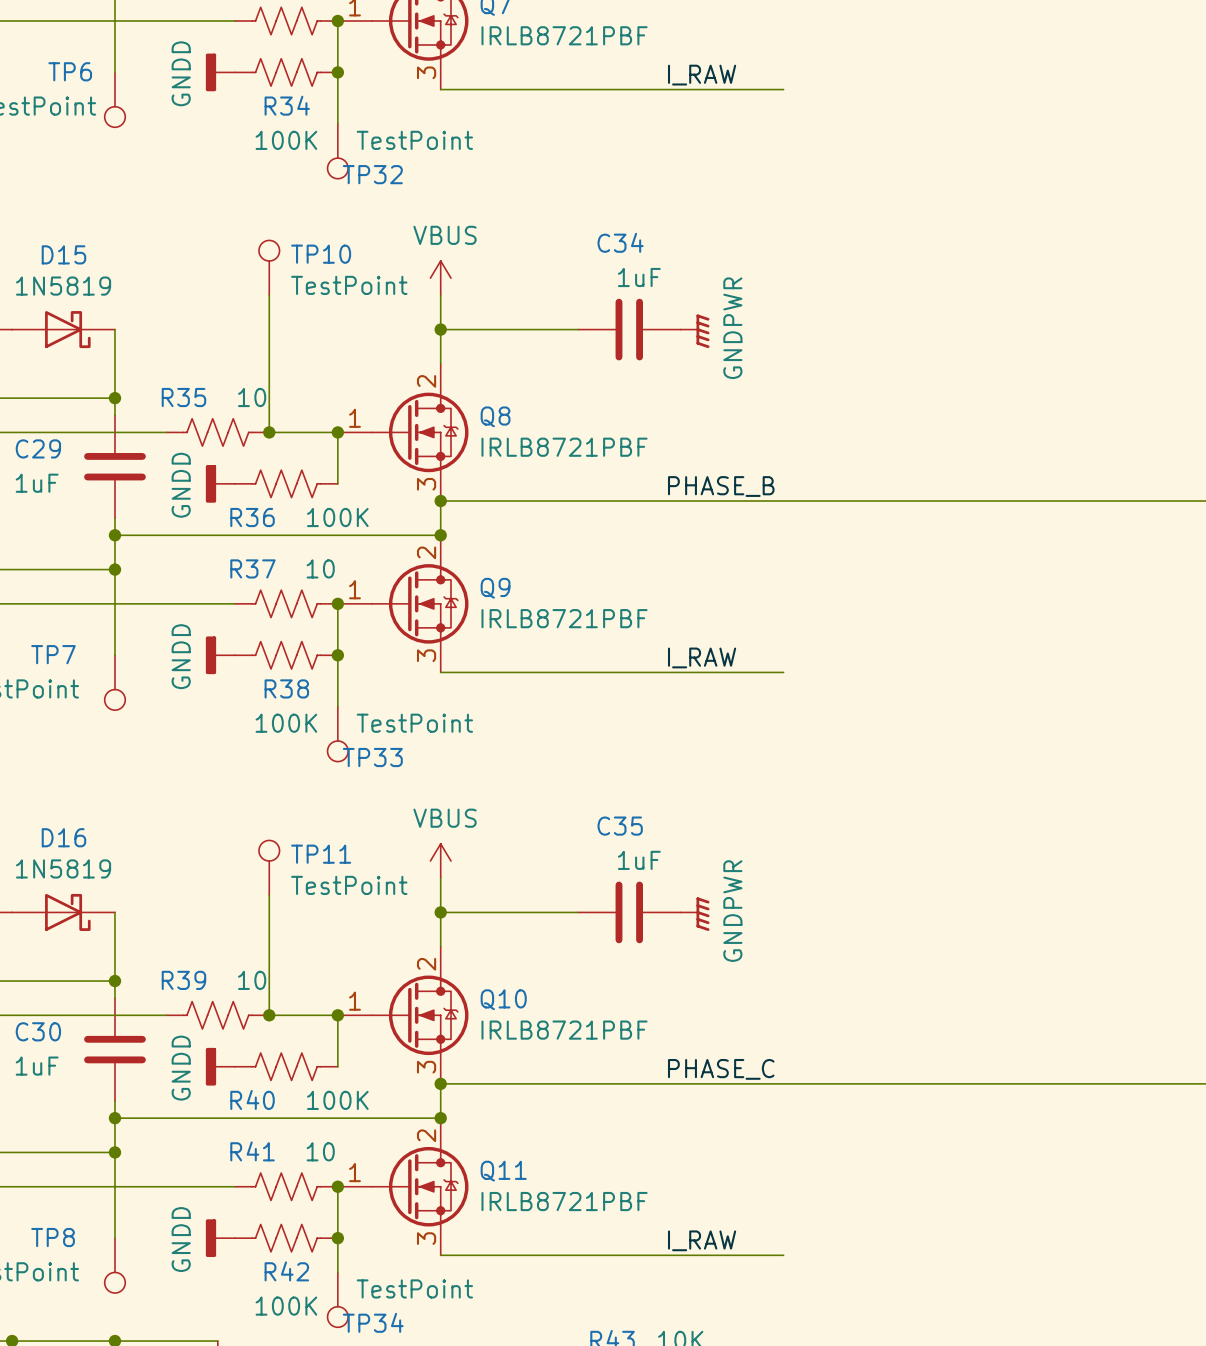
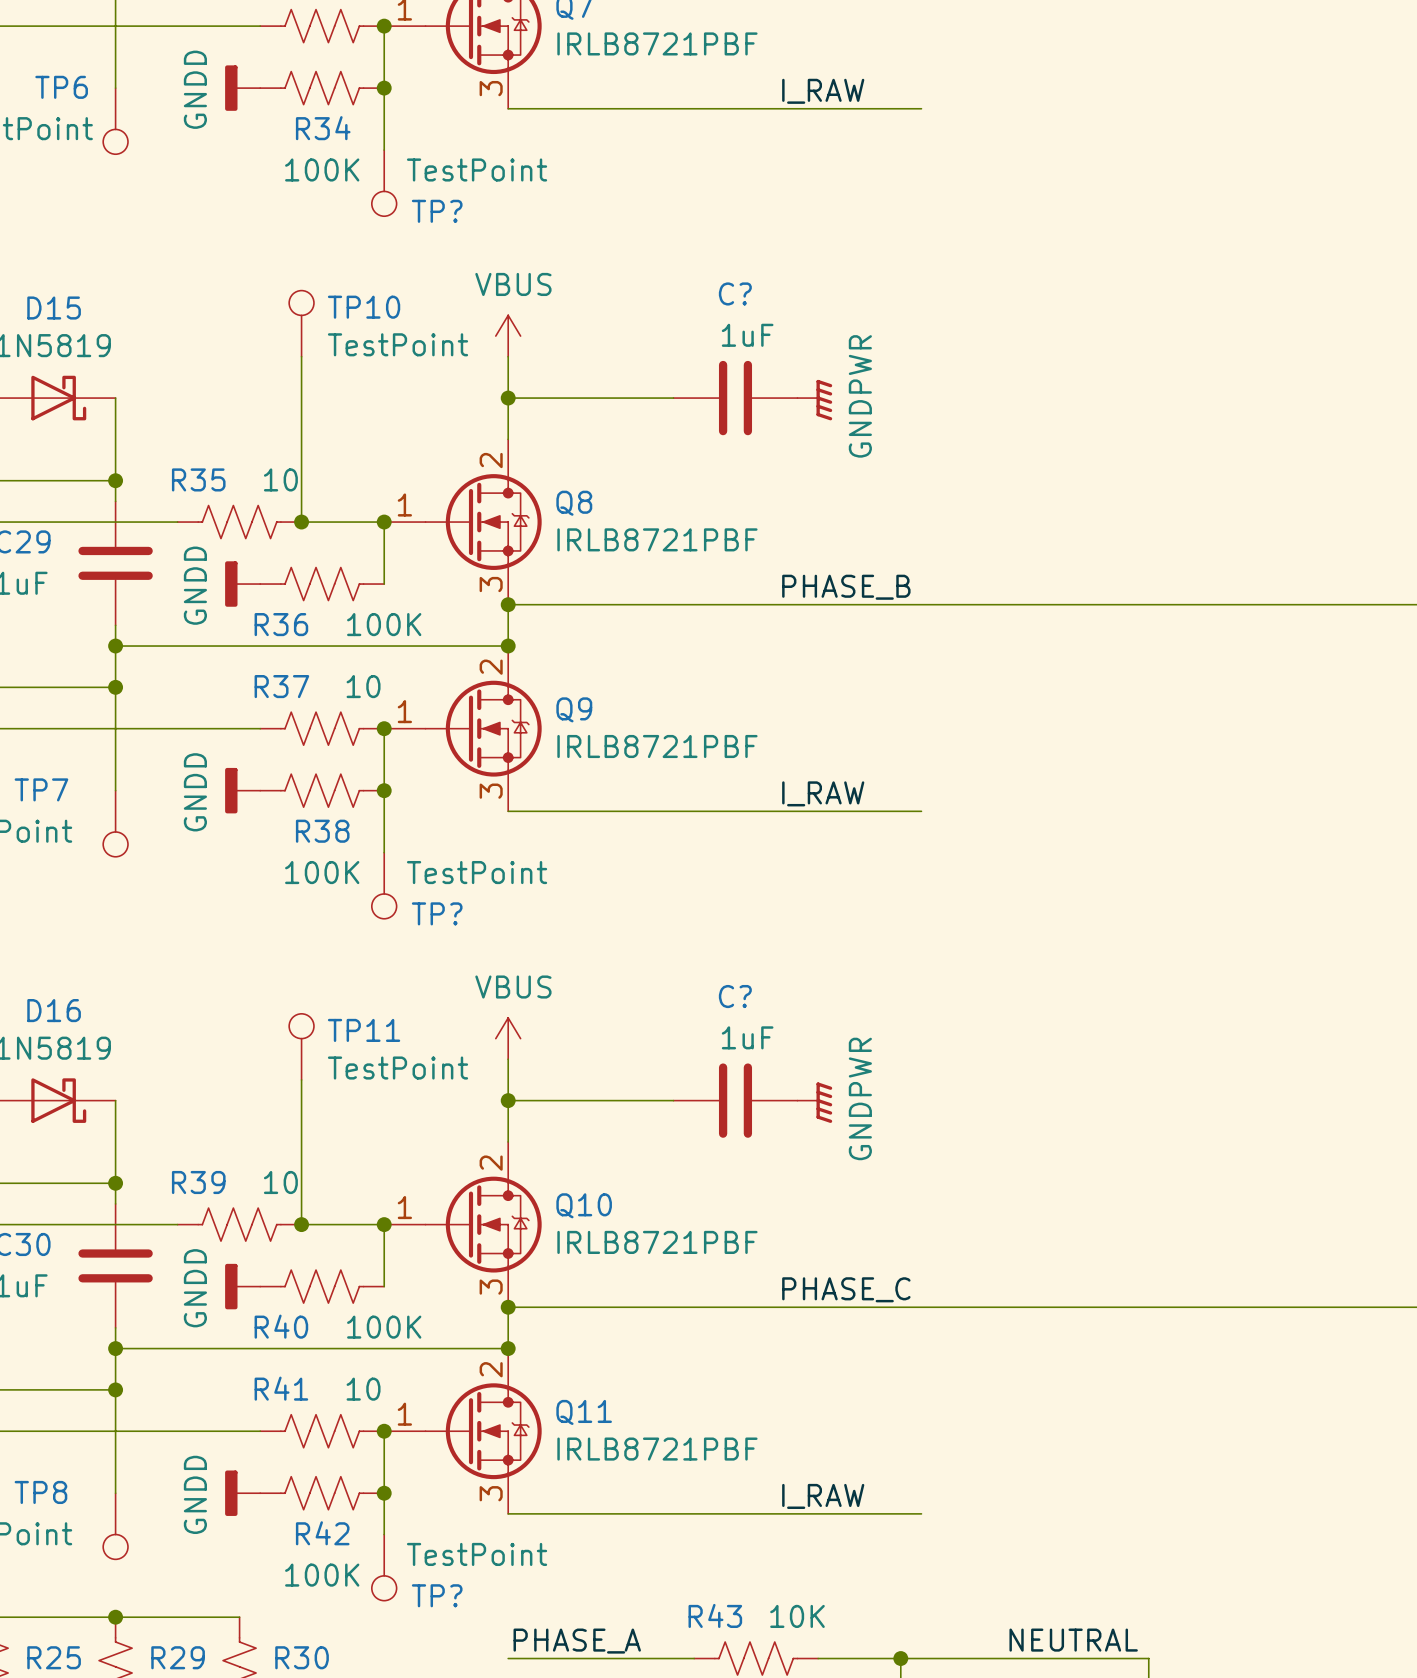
TP32 name: TP32 (372, 174) -> TP? (437, 211)
C34 name: C34 (620, 242) -> C? (735, 293)
TP33 name: TP33 (372, 757) -> TP? (437, 913)
C35 name: C35 (620, 826) -> C? (735, 996)
TP34 name: TP34 (373, 1322) -> TP? (437, 1595)

